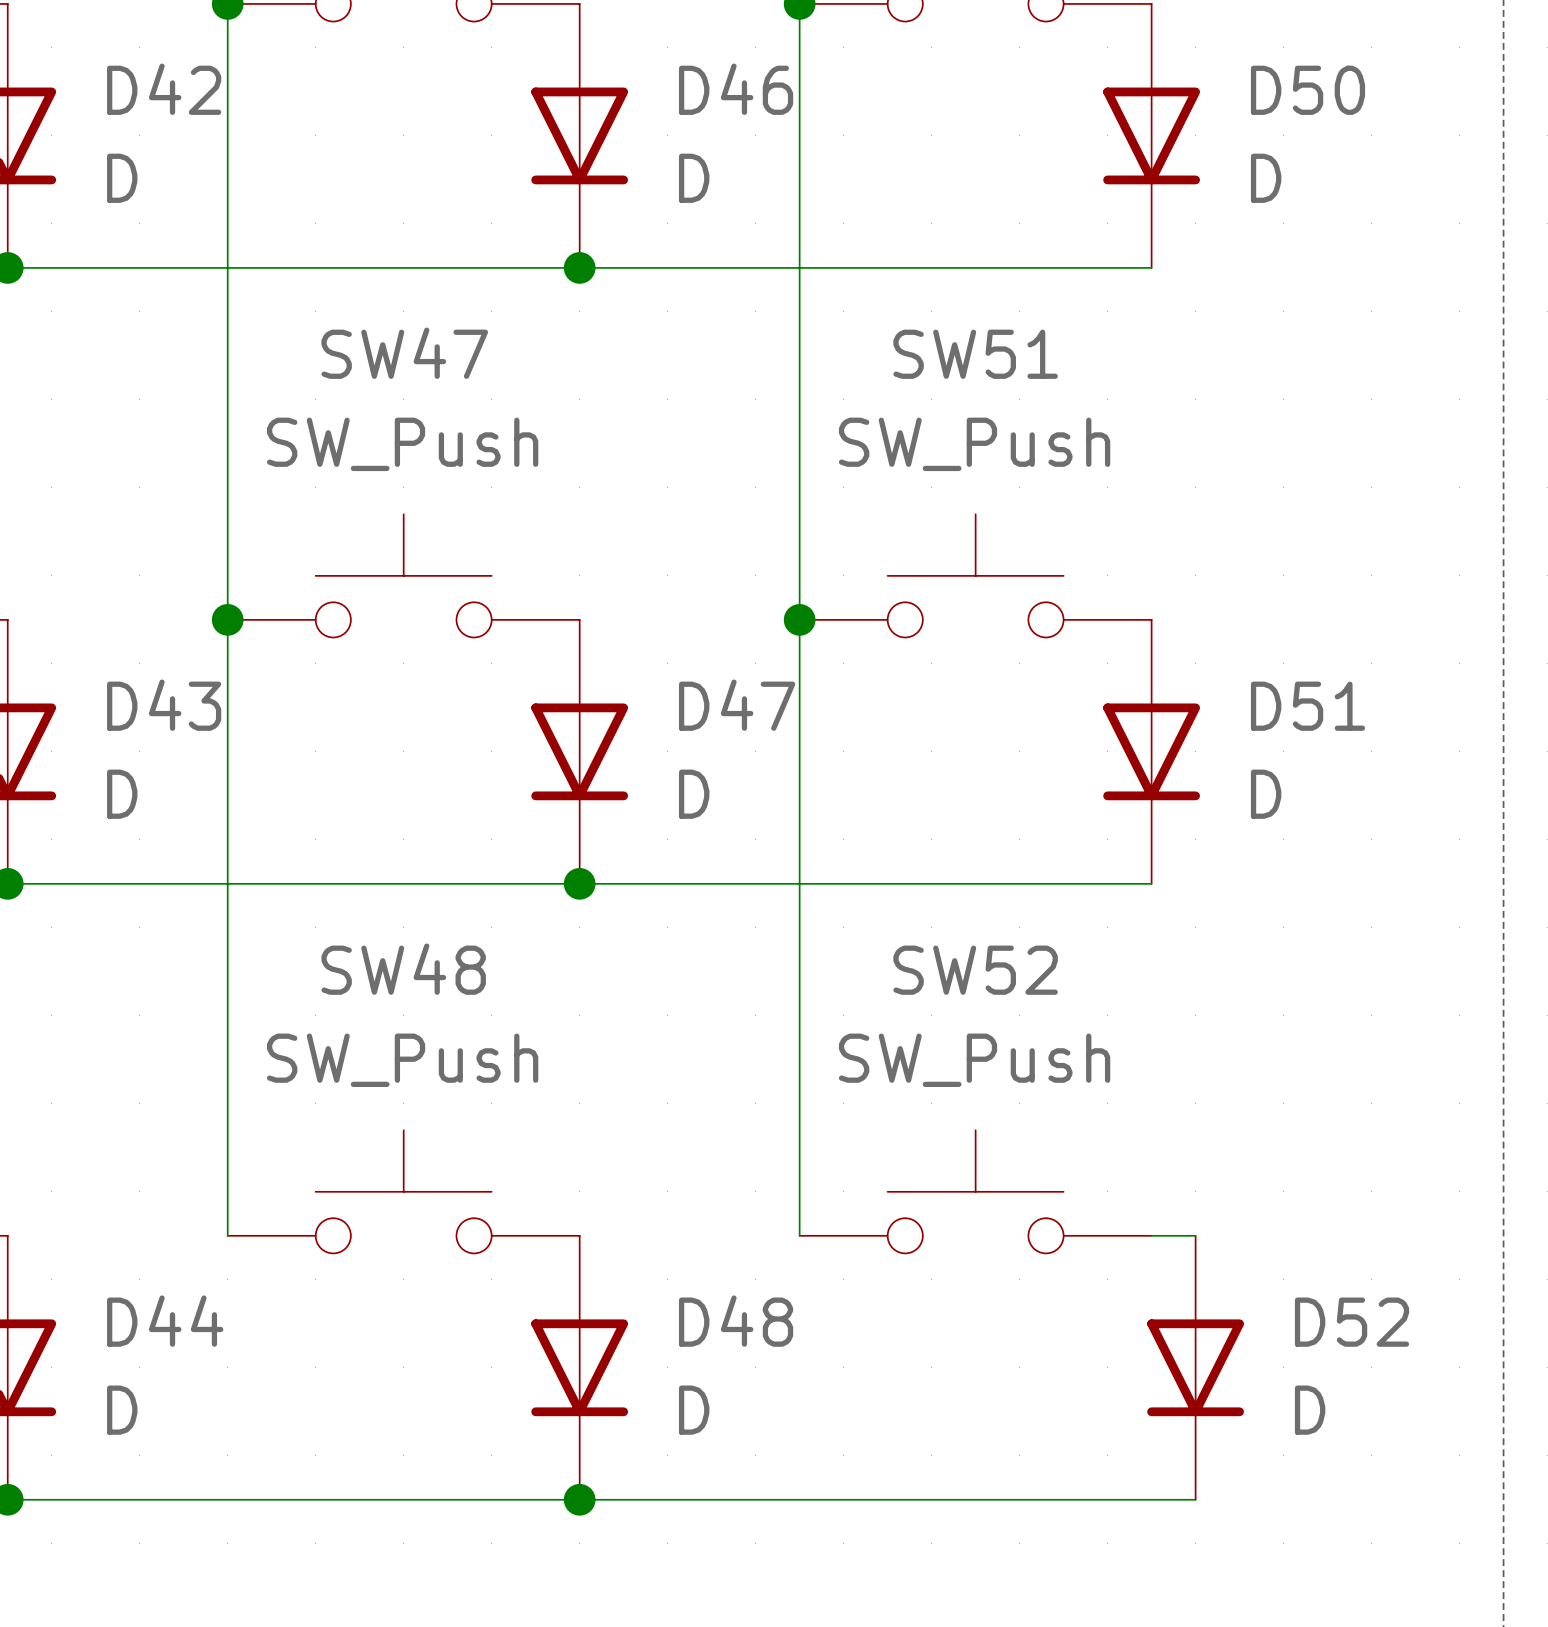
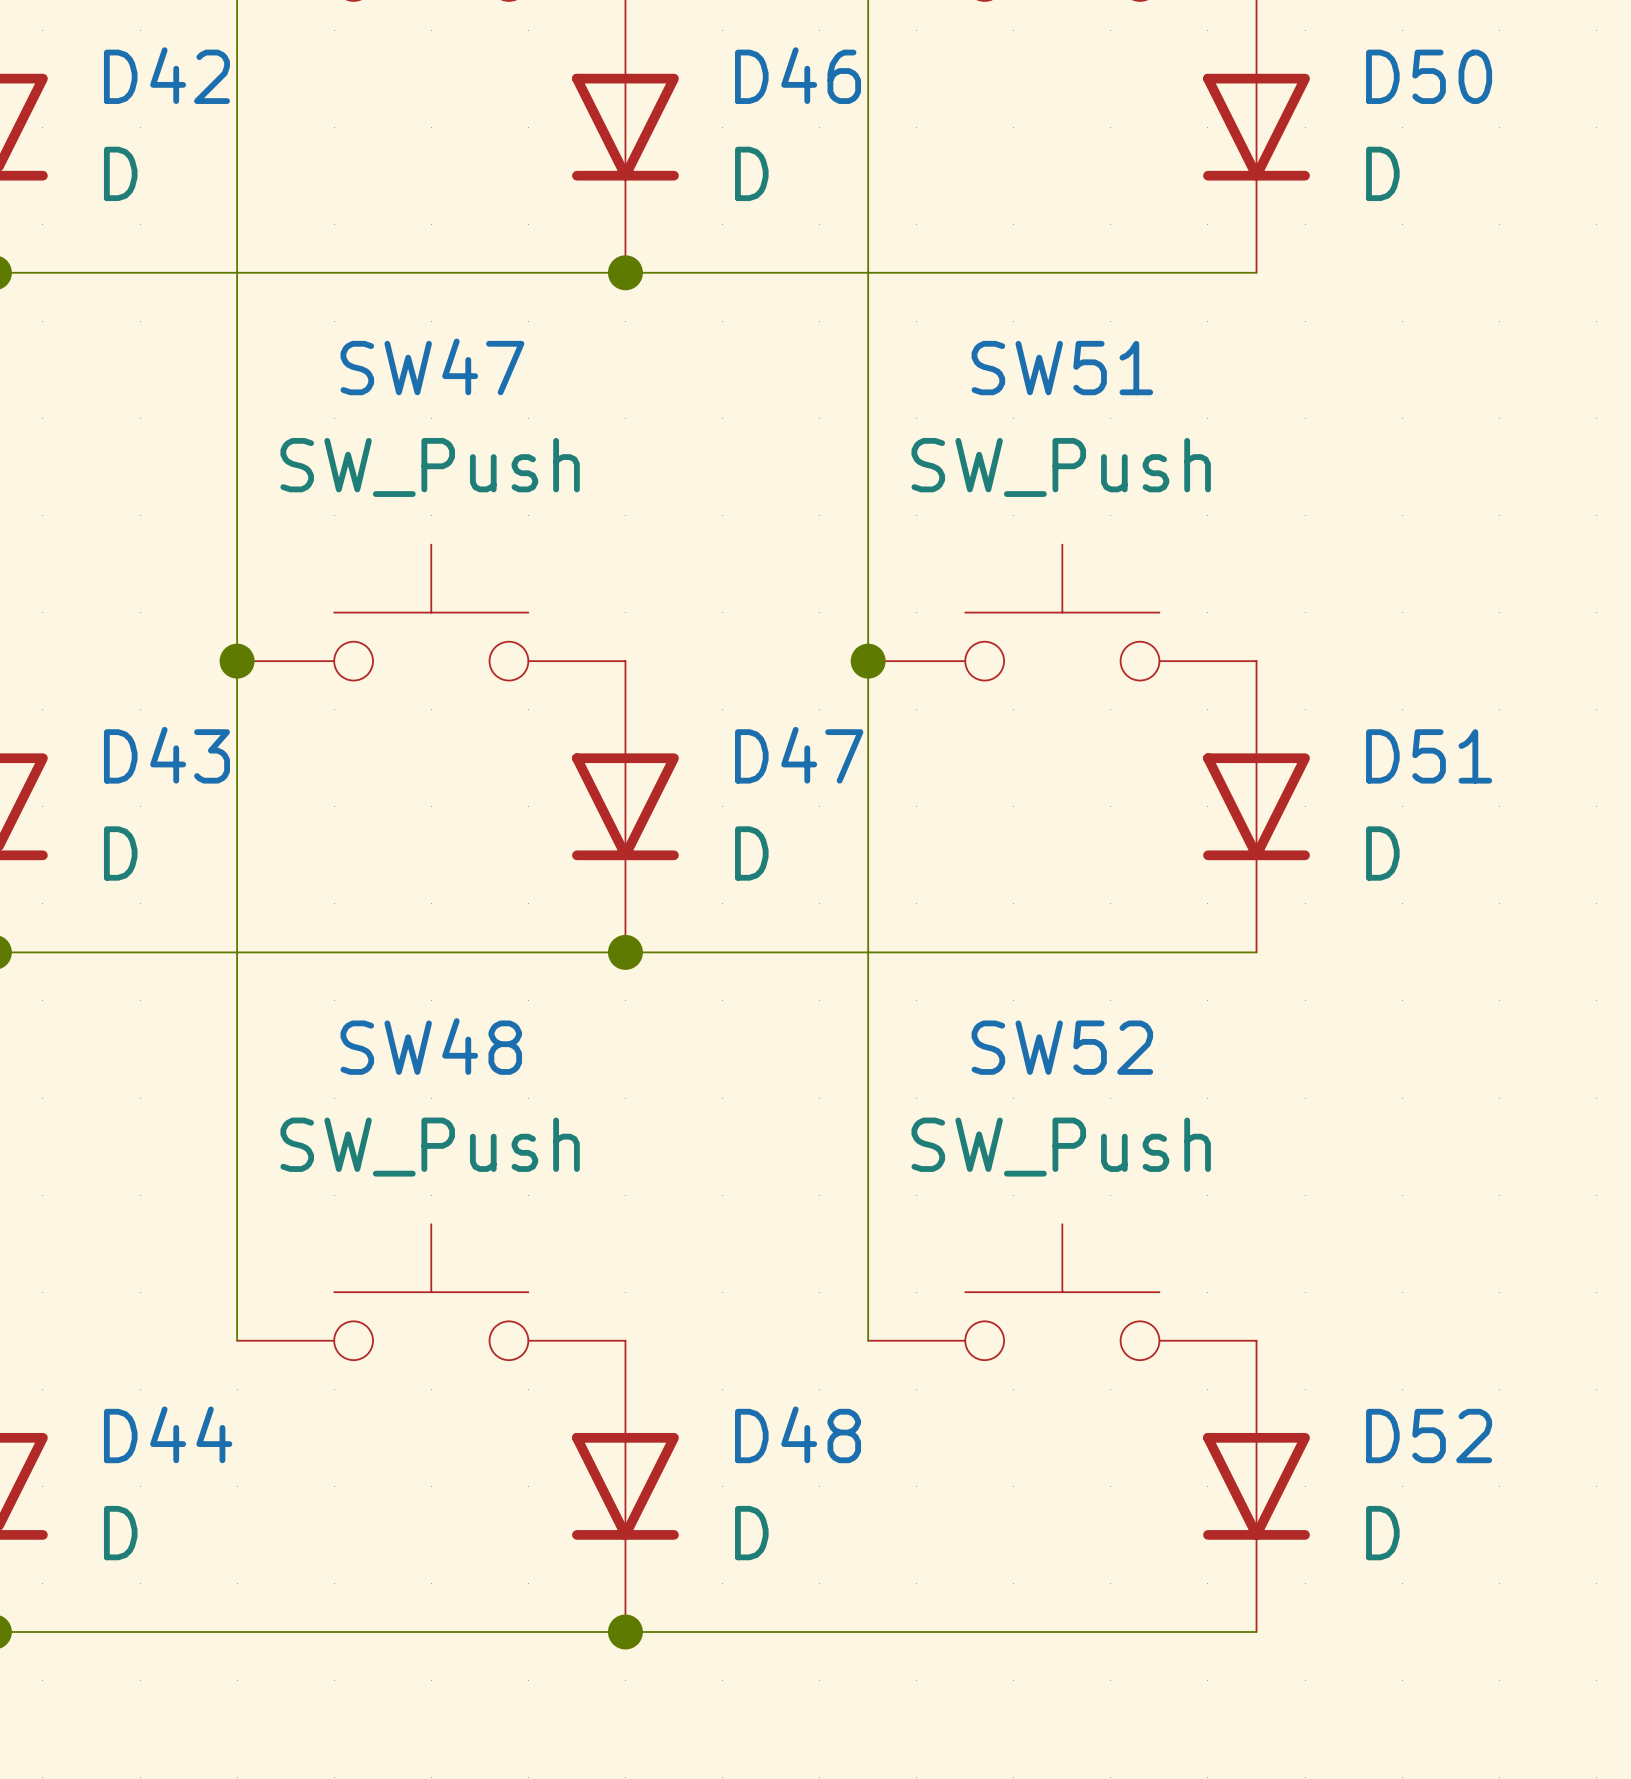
wire: (1151, 1235) (1195, 1235) -> none
D52 position: (1195, 1367) -> (1256, 1486)
wire: (1151, 1499) (1195, 1499) -> none

